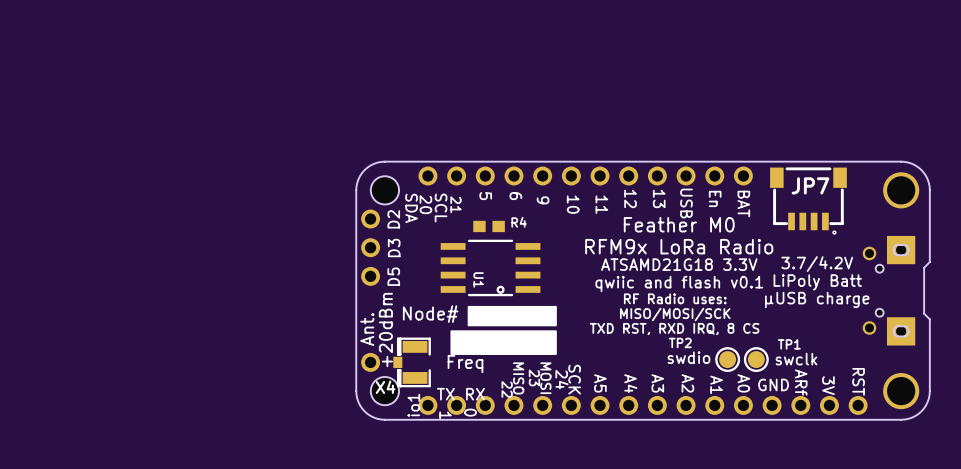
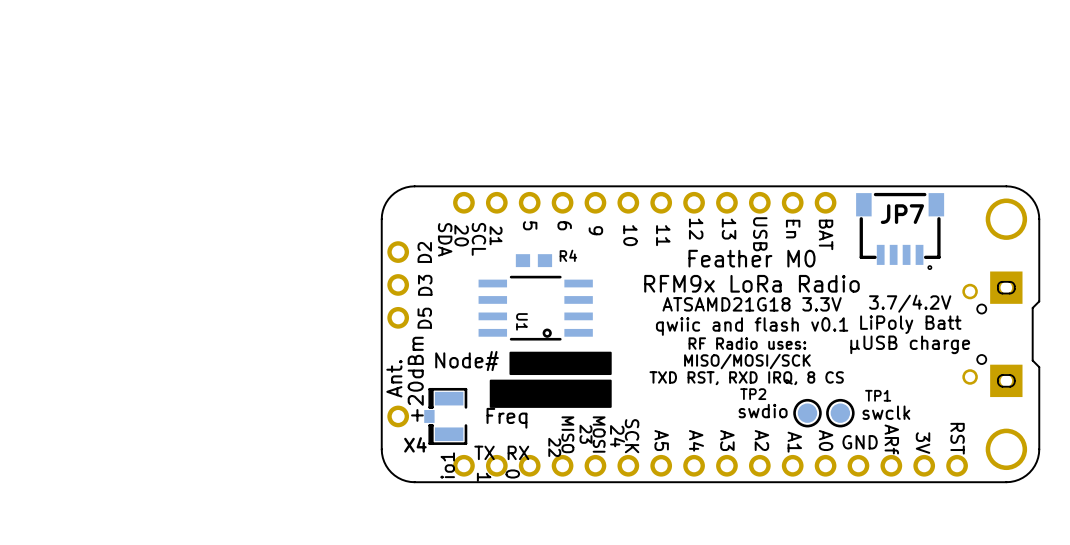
part: (384, 190) -> none
part: (384, 391) -> none

